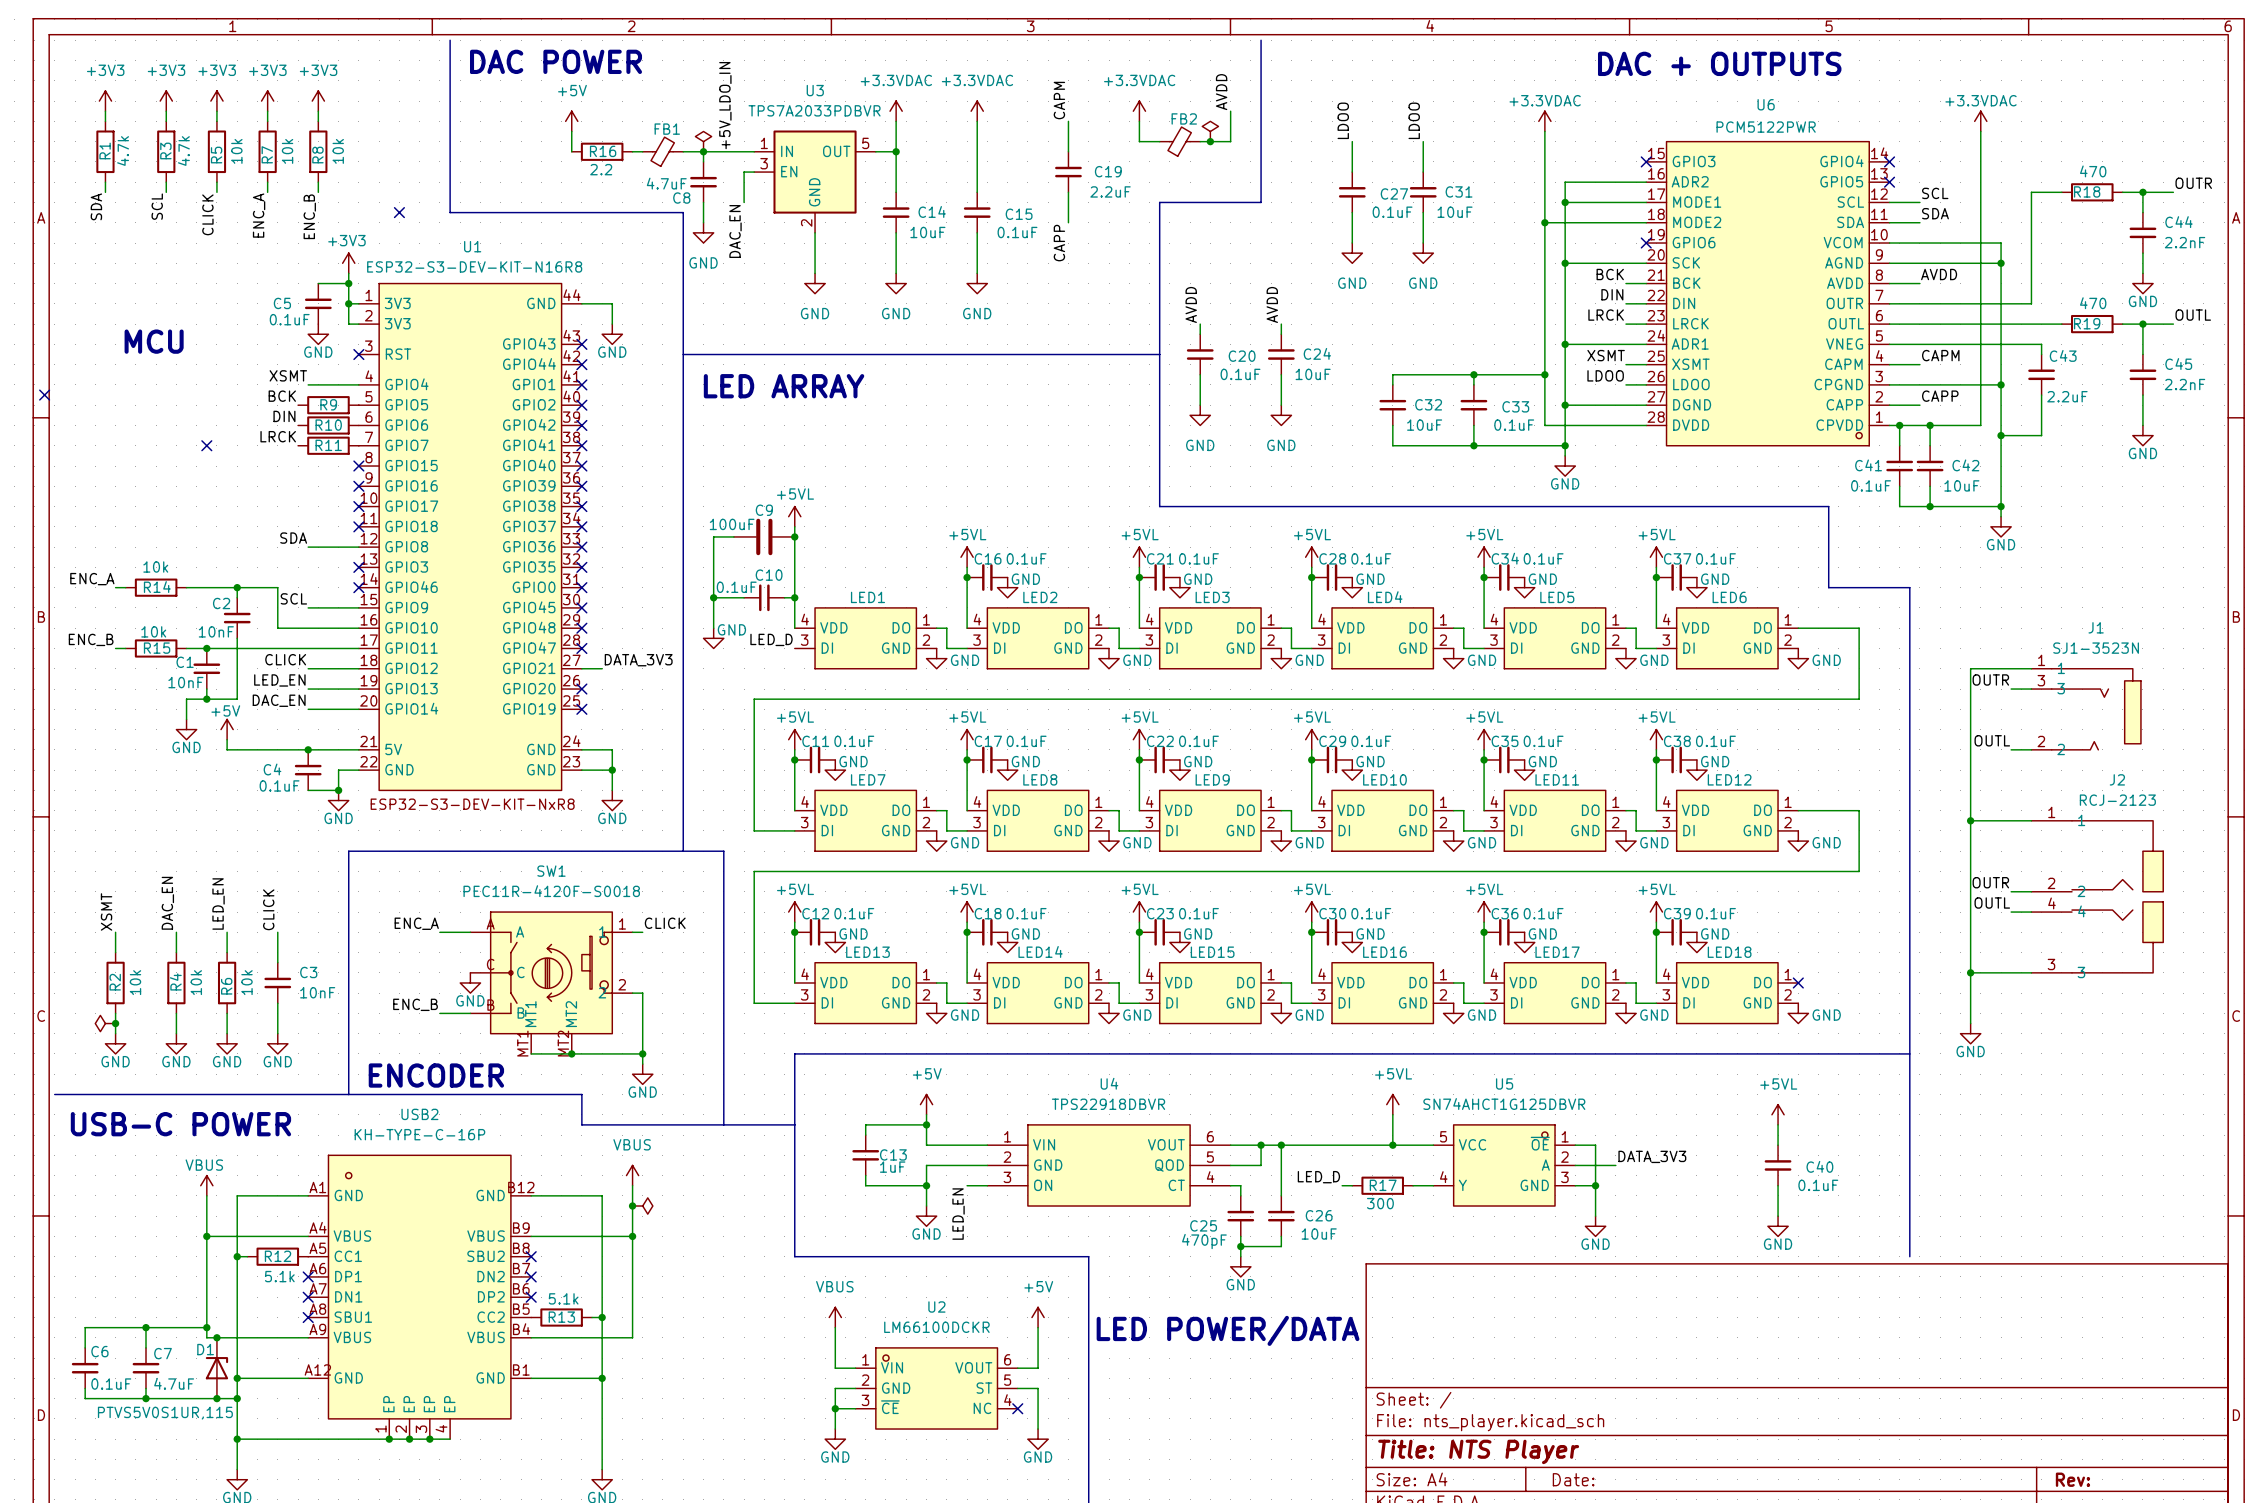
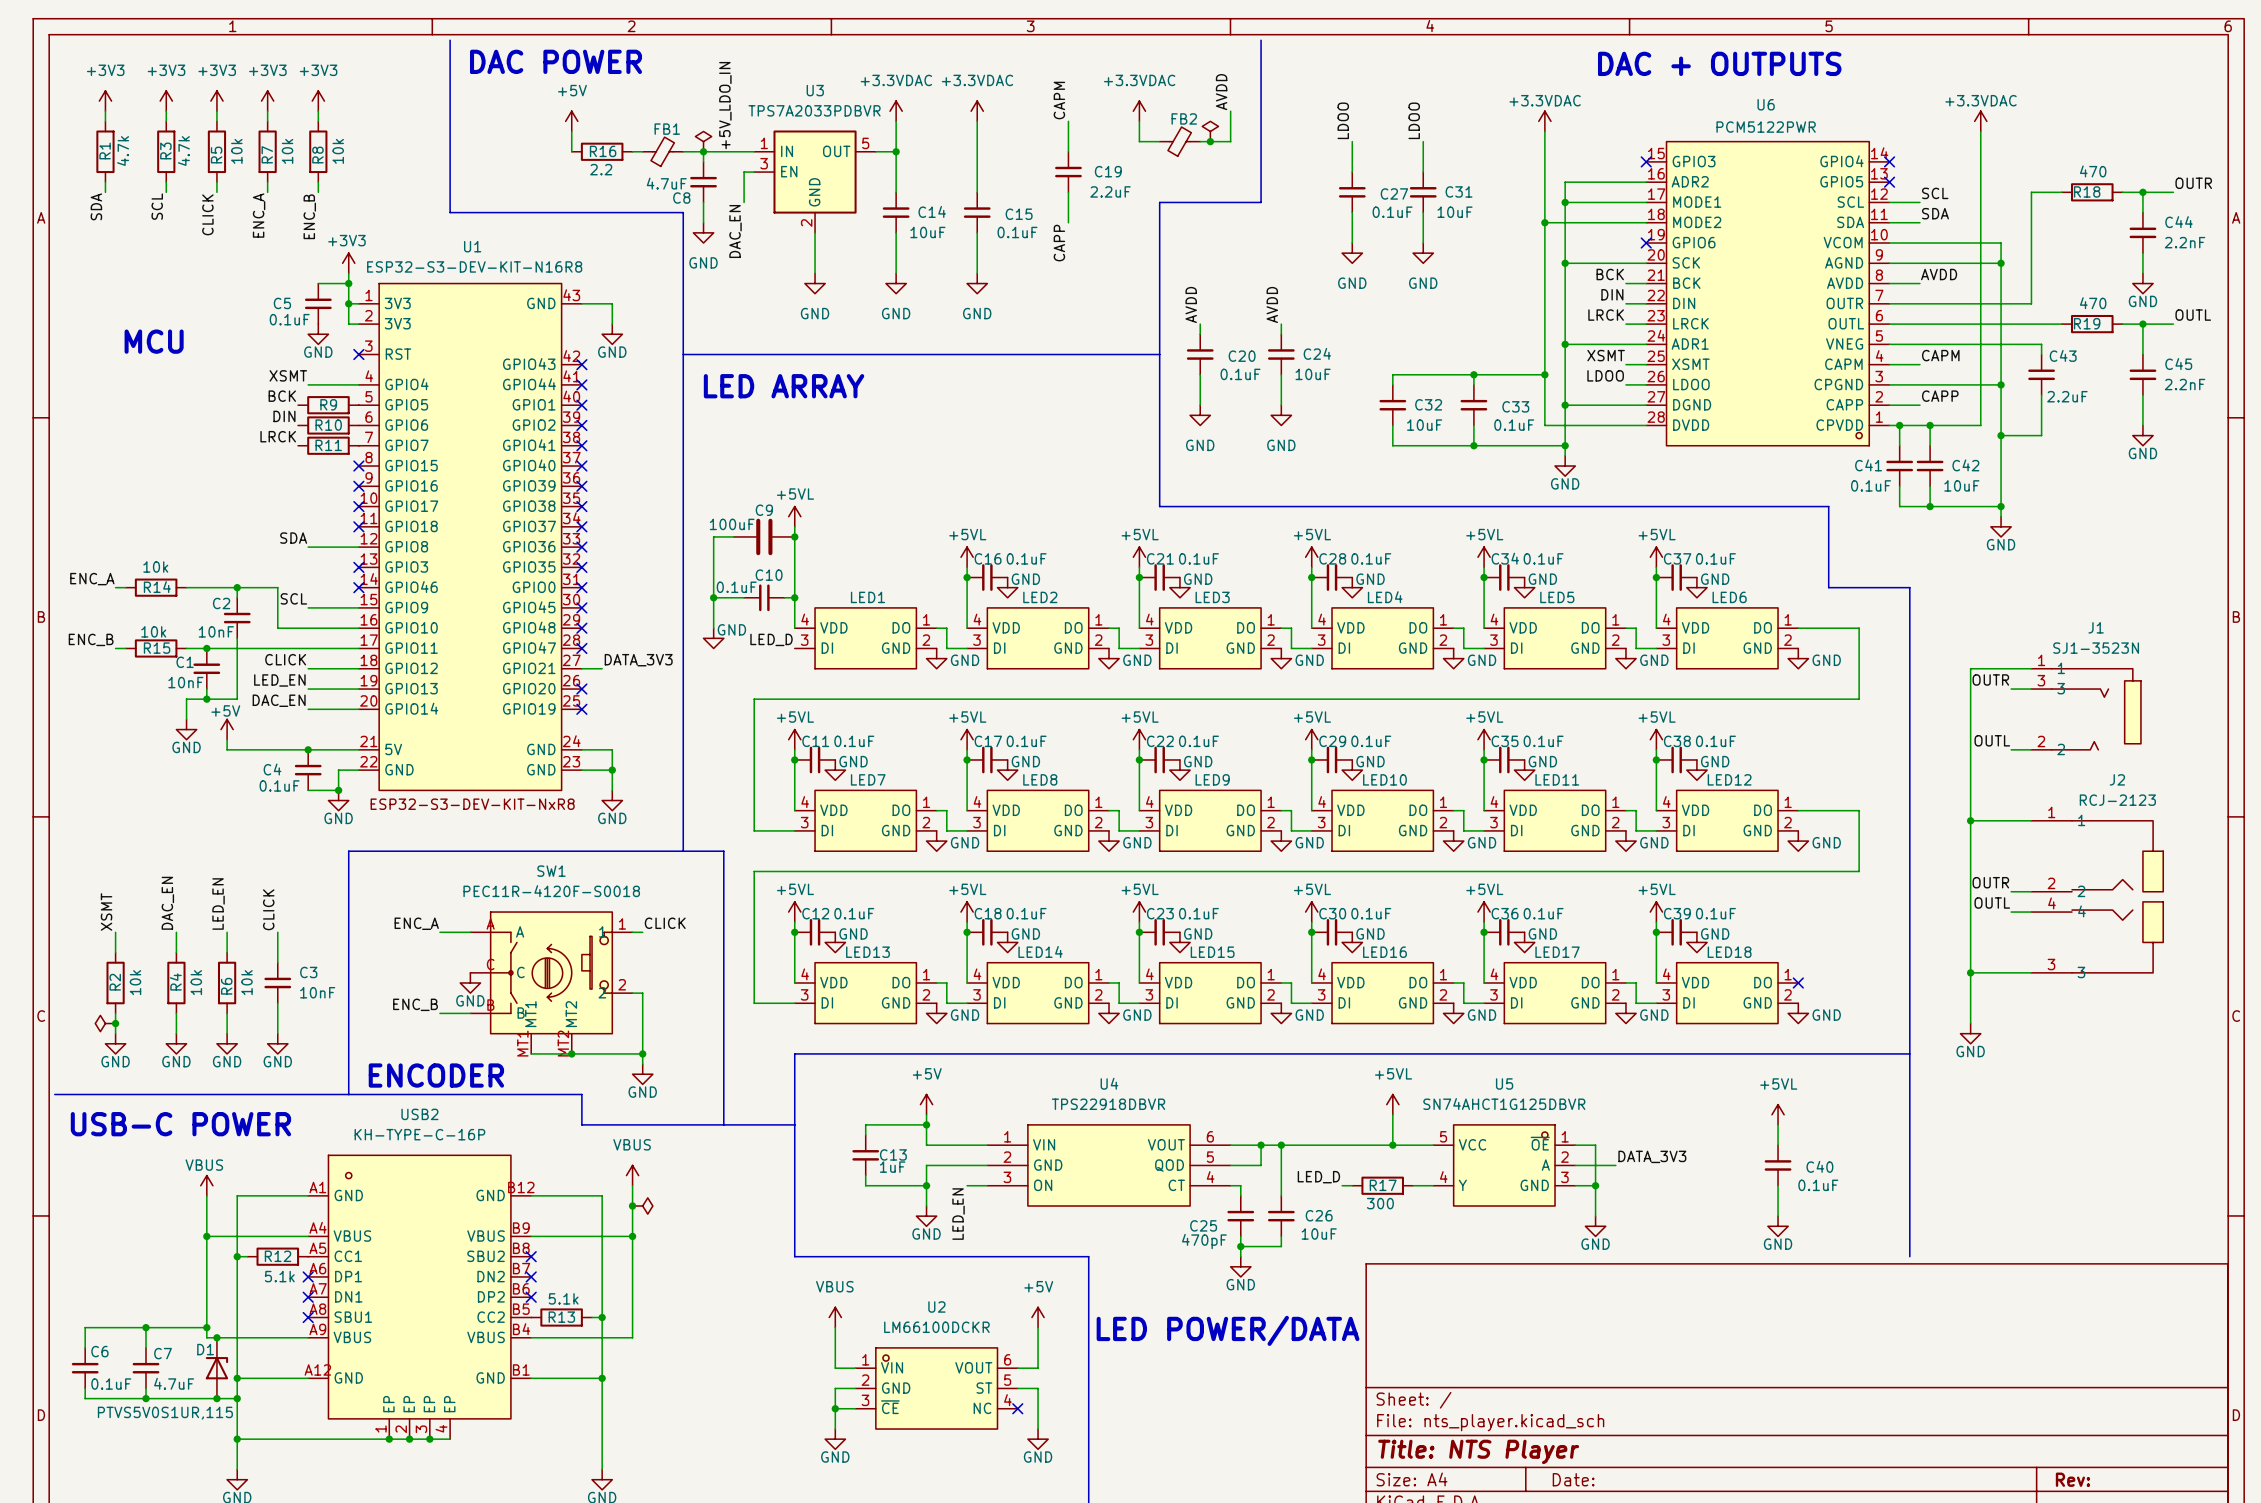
no-connect mark: (399, 212) -> none
U1 symbol: [358, 283, 582, 791] -> [358, 283, 582, 791]
no-connect mark: (581, 344) -> none
no-connect mark: (44, 395) -> none
no-connect mark: (206, 445) -> none

